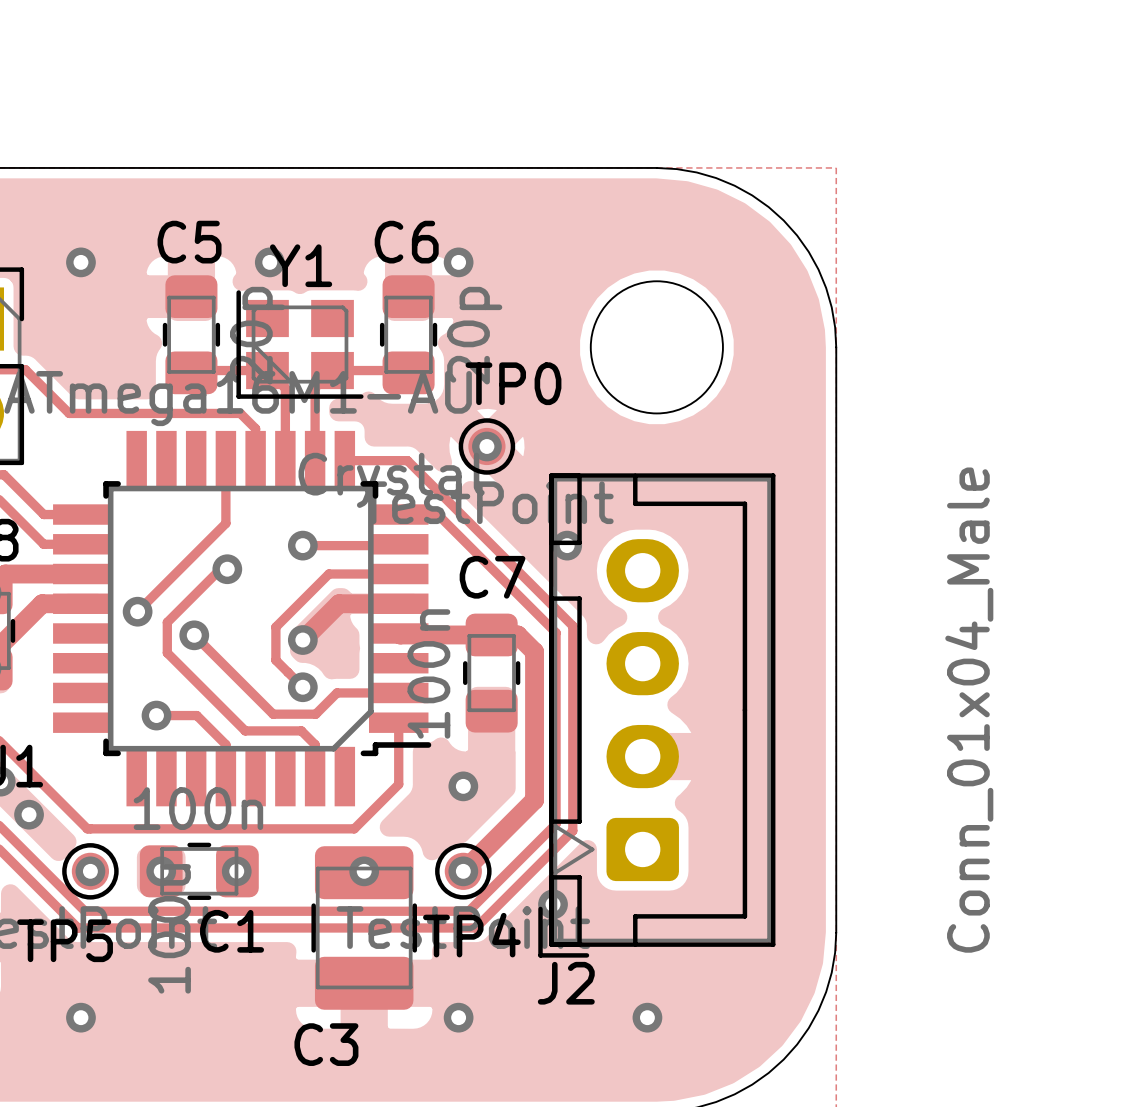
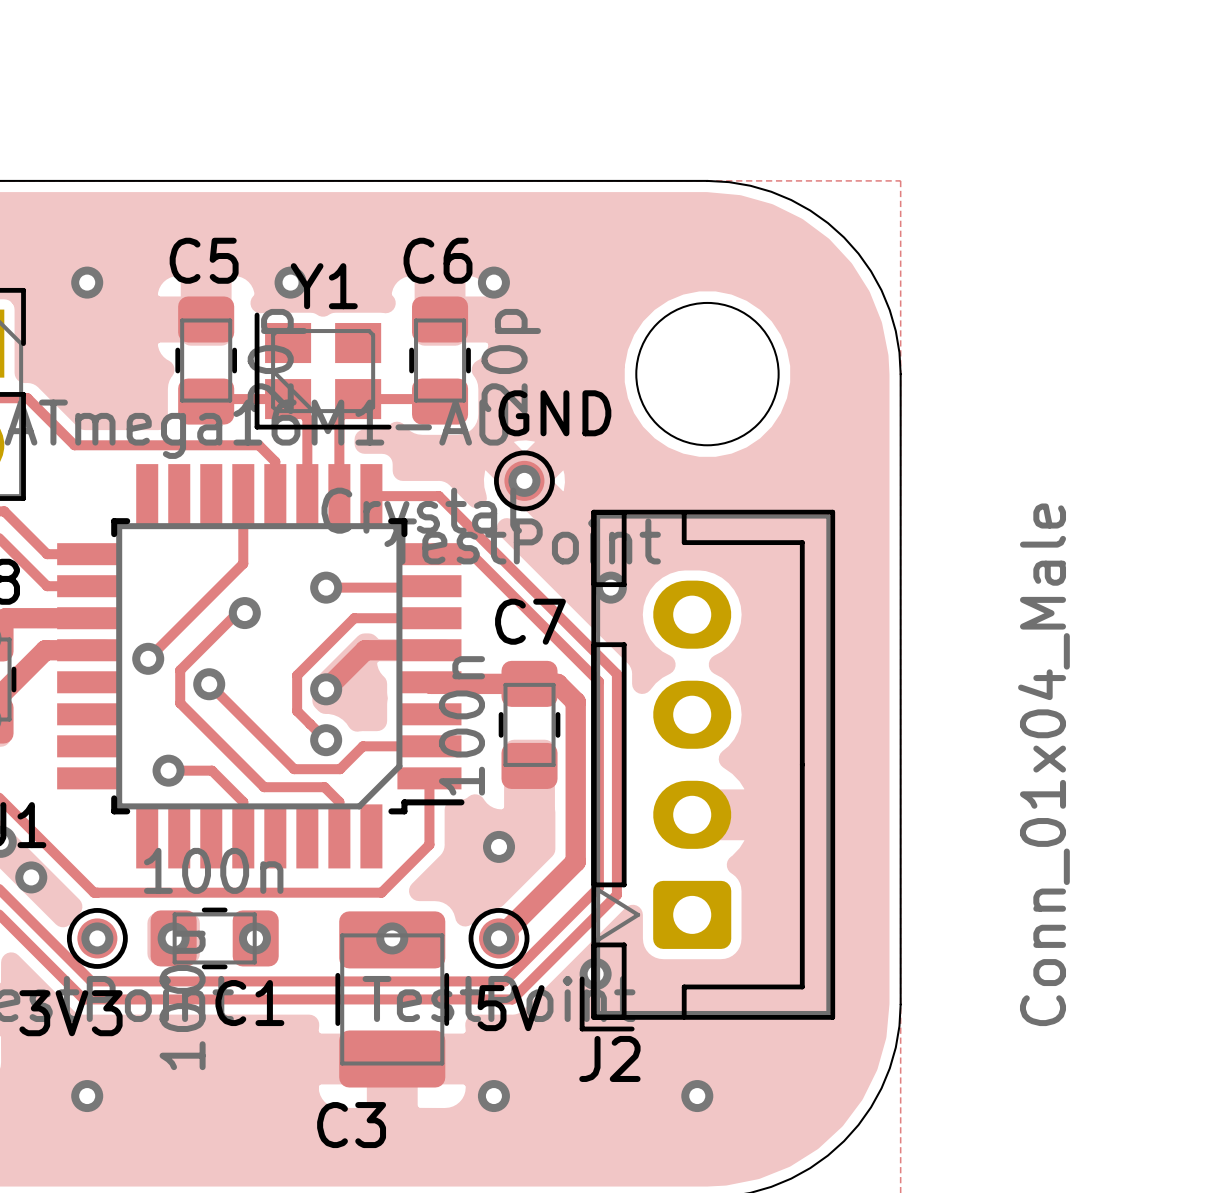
TP0 name: TP0 (513, 383) -> GND (554, 413)
TP4 name: TP4 (471, 935) -> 5V (511, 1008)
TP5 name: TP5 (65, 940) -> 3V3 (71, 1013)

